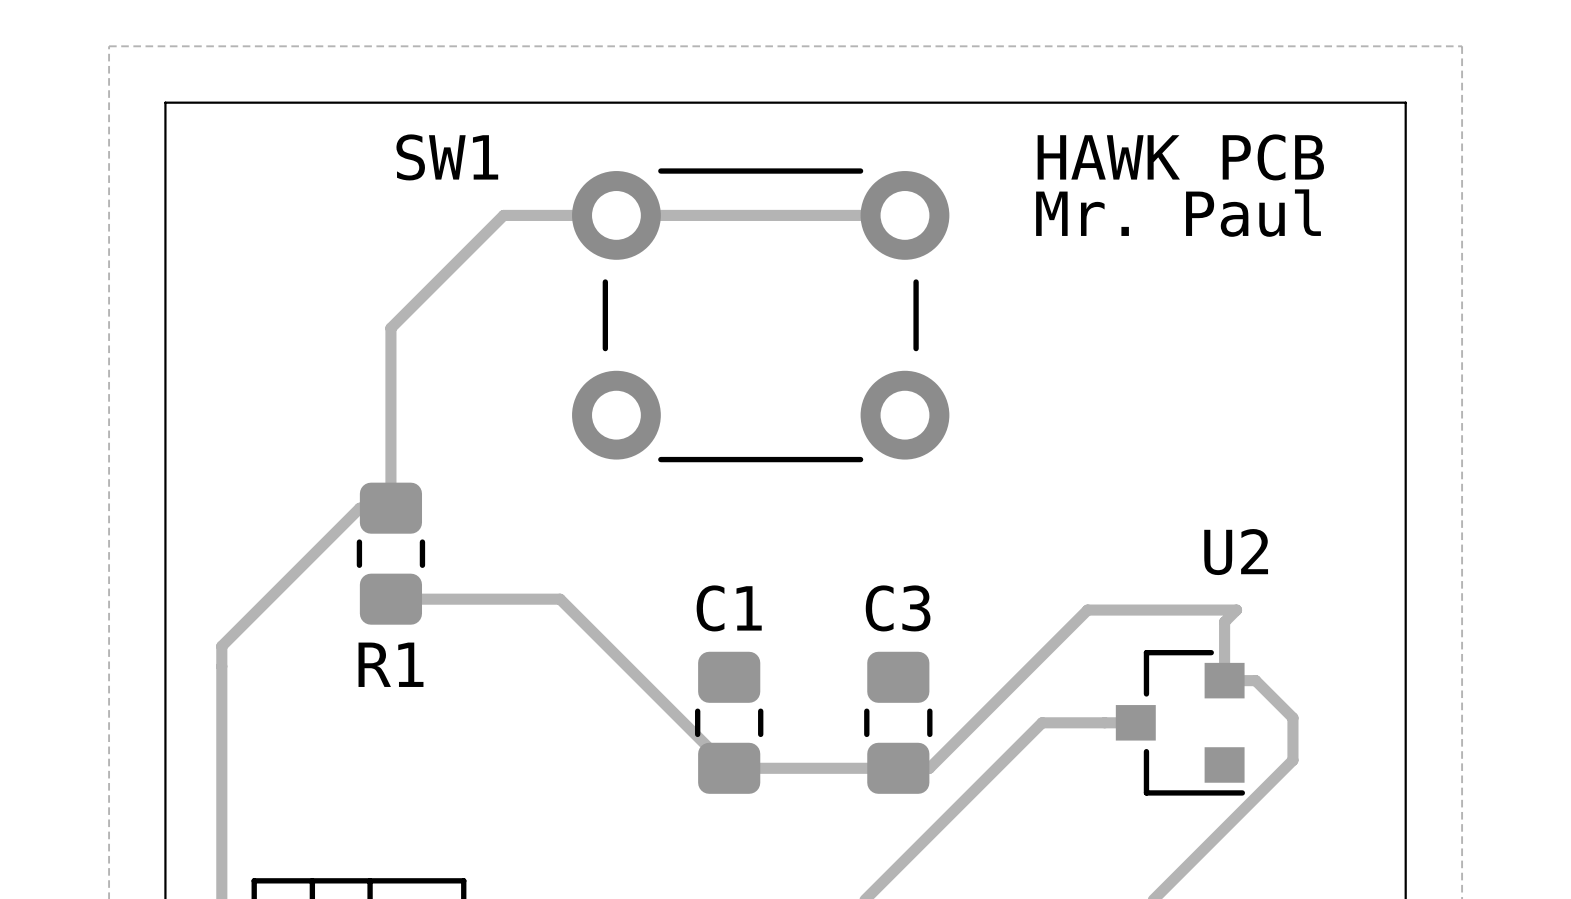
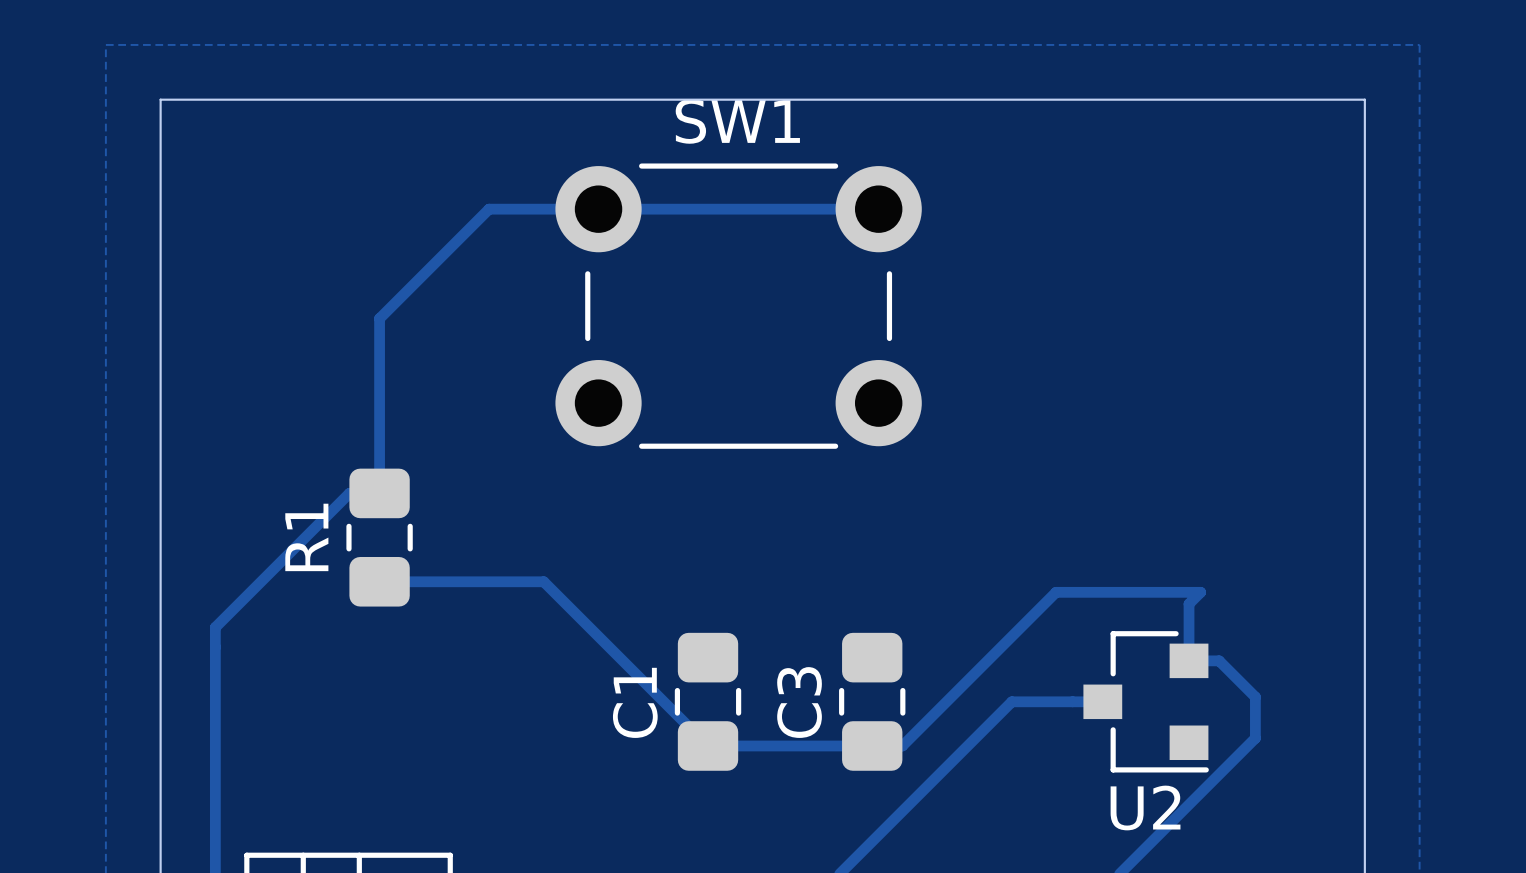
SW1 name position: SW1 (447, 157) -> SW1 (737, 121)
text: HAWK PCB (1180, 157) -> none
text: Mr. Paul (1178, 213) -> none
U2 name position: U2 (1236, 552) -> U2 (1145, 807)
C1 name rotation: 0° (729, 608) -> 90° counterclockwise (635, 702)
C1 name position: C1 (729, 608) -> C1 (635, 702)
C3 name rotation: 0° (898, 608) -> 90° counterclockwise (799, 702)
C3 name position: C3 (898, 608) -> C3 (799, 702)
R1 name rotation: 0° (391, 664) -> 90° counterclockwise (306, 537)
R1 name position: R1 (391, 664) -> R1 (306, 537)

